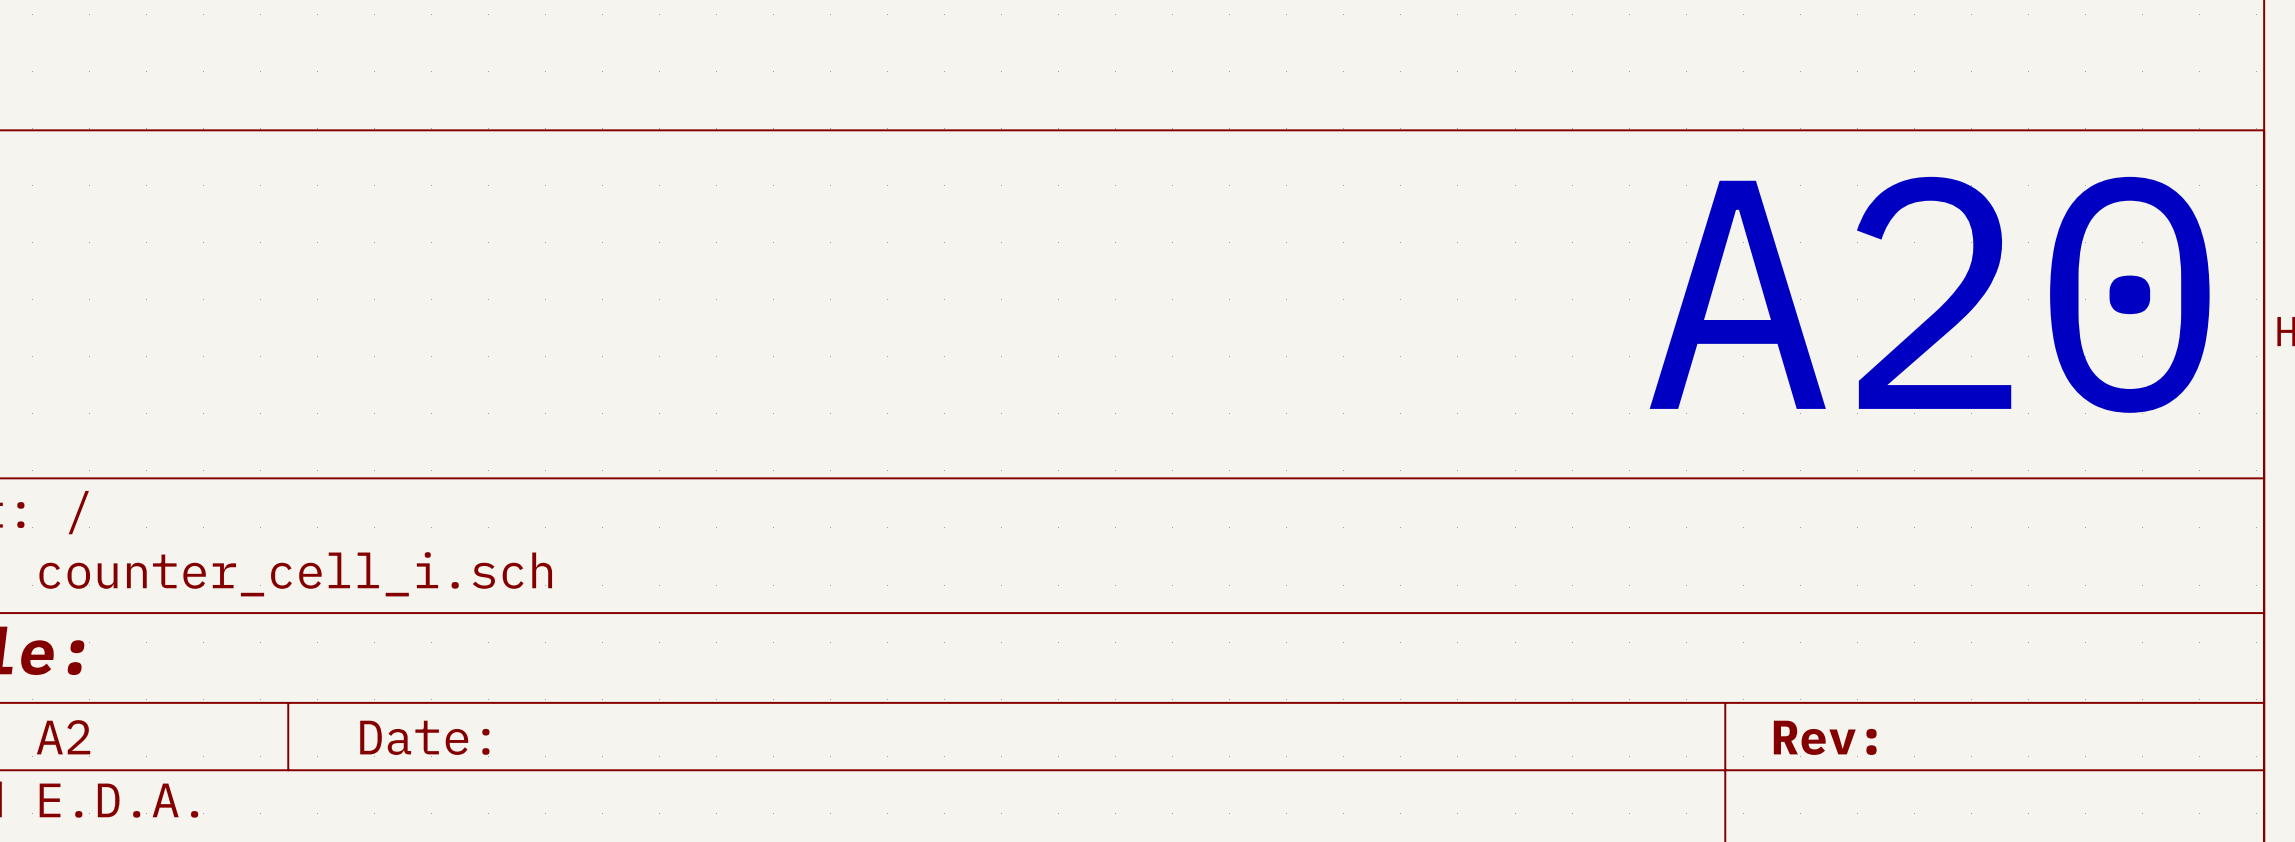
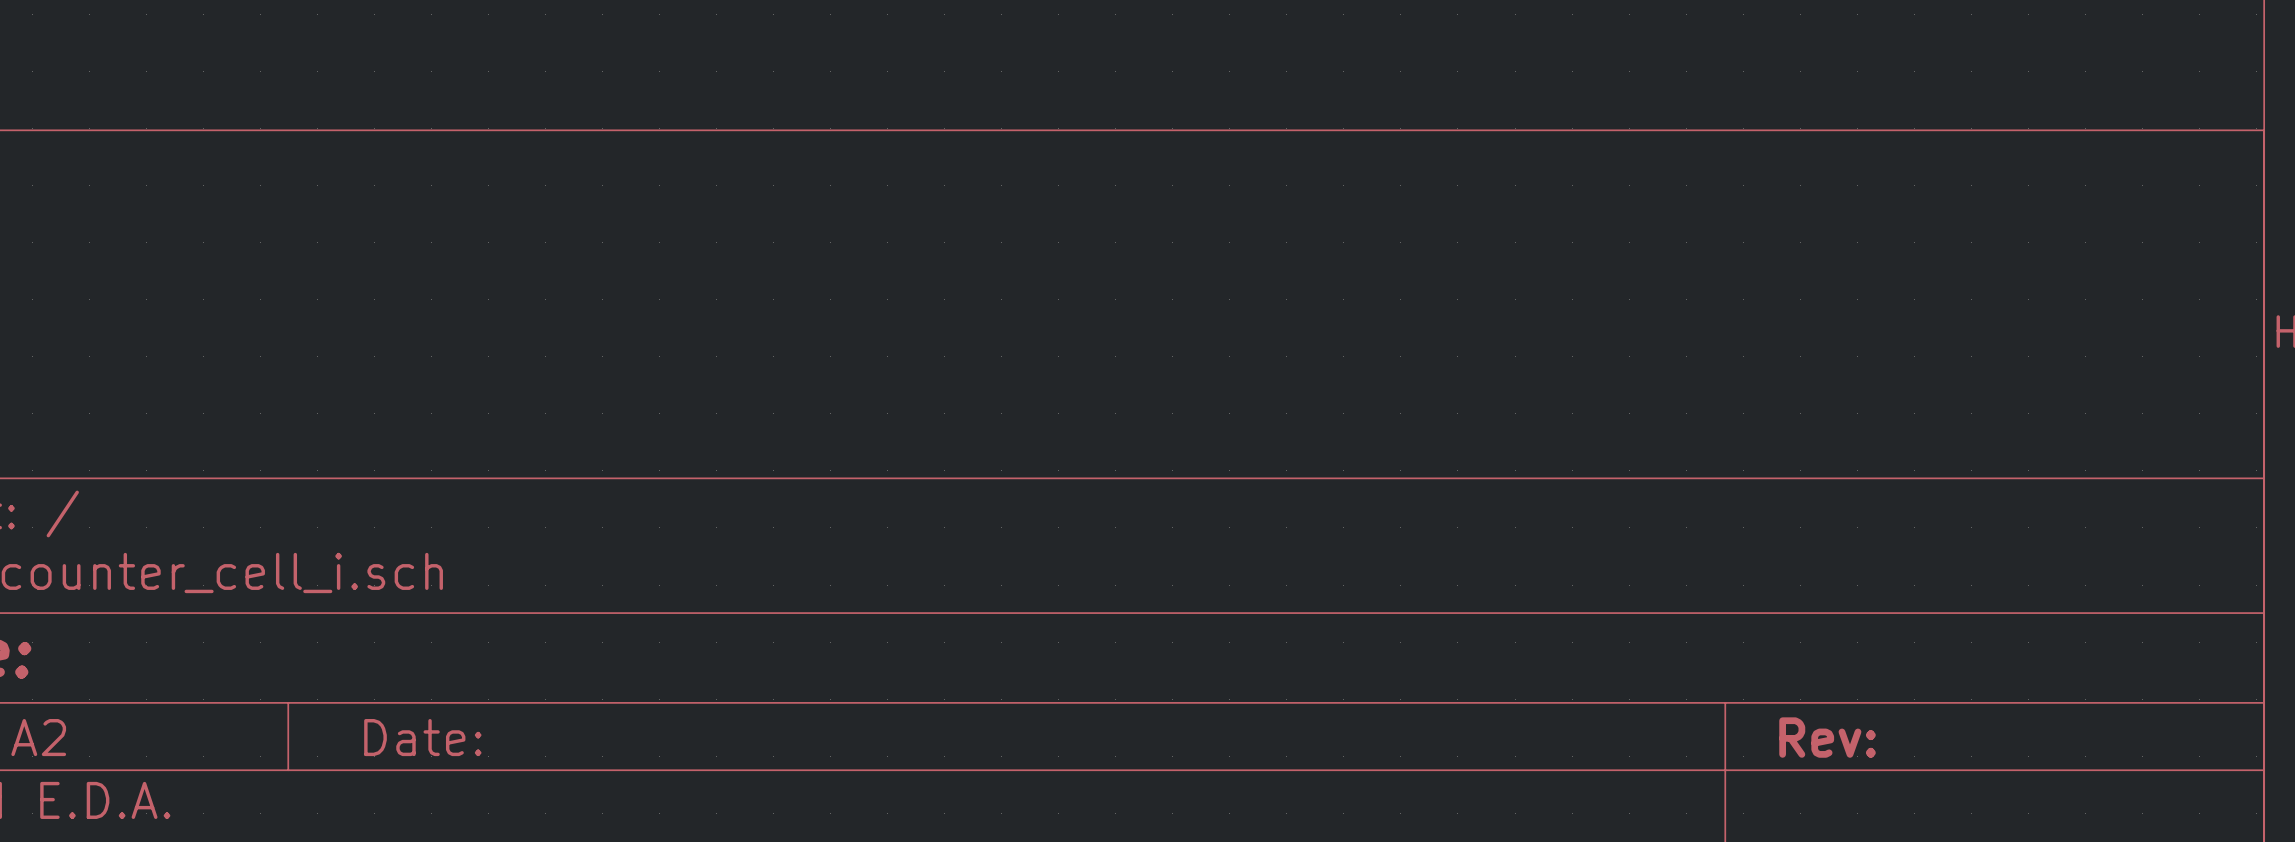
text: A20 (1929, 294) -> none

